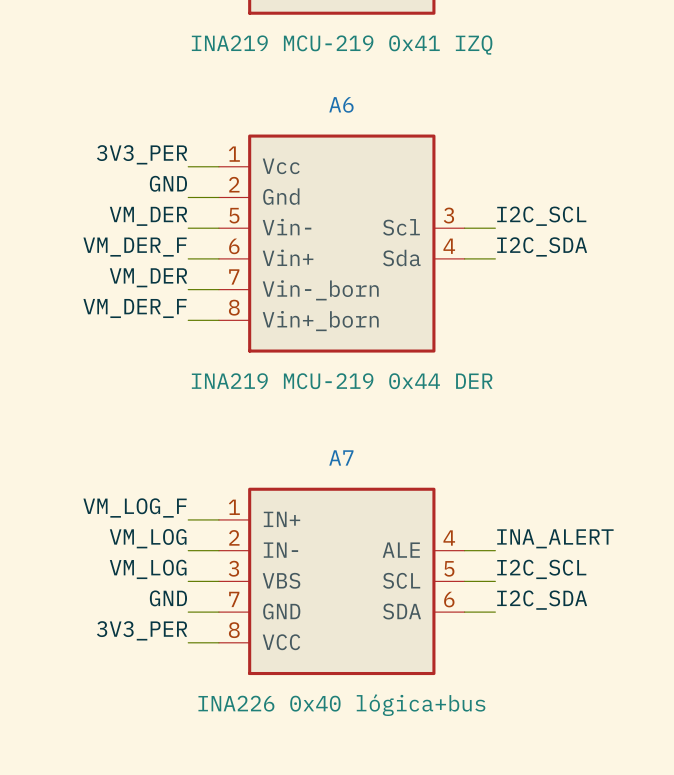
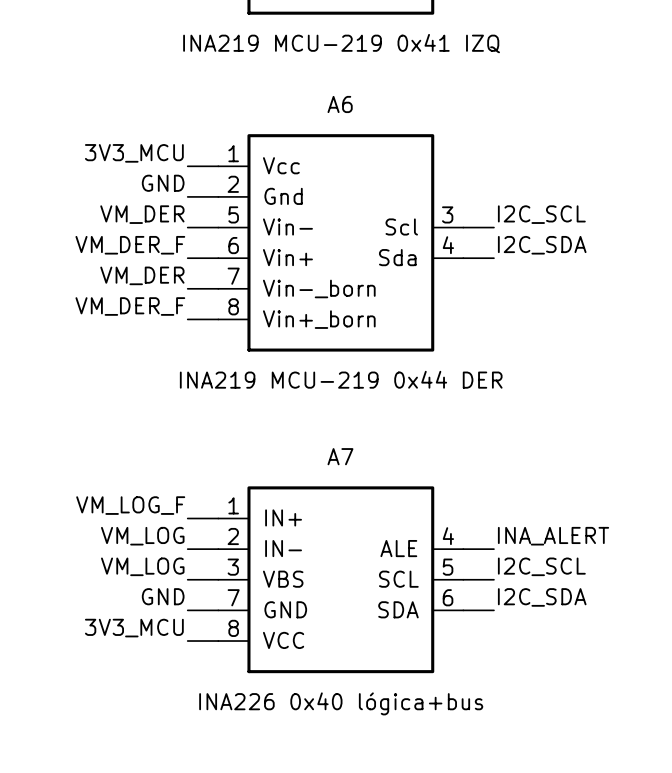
label: 3V3_PER (142, 154) -> 3V3_MCU (134, 153)
label: 3V3_PER (142, 630) -> 3V3_MCU (134, 628)

